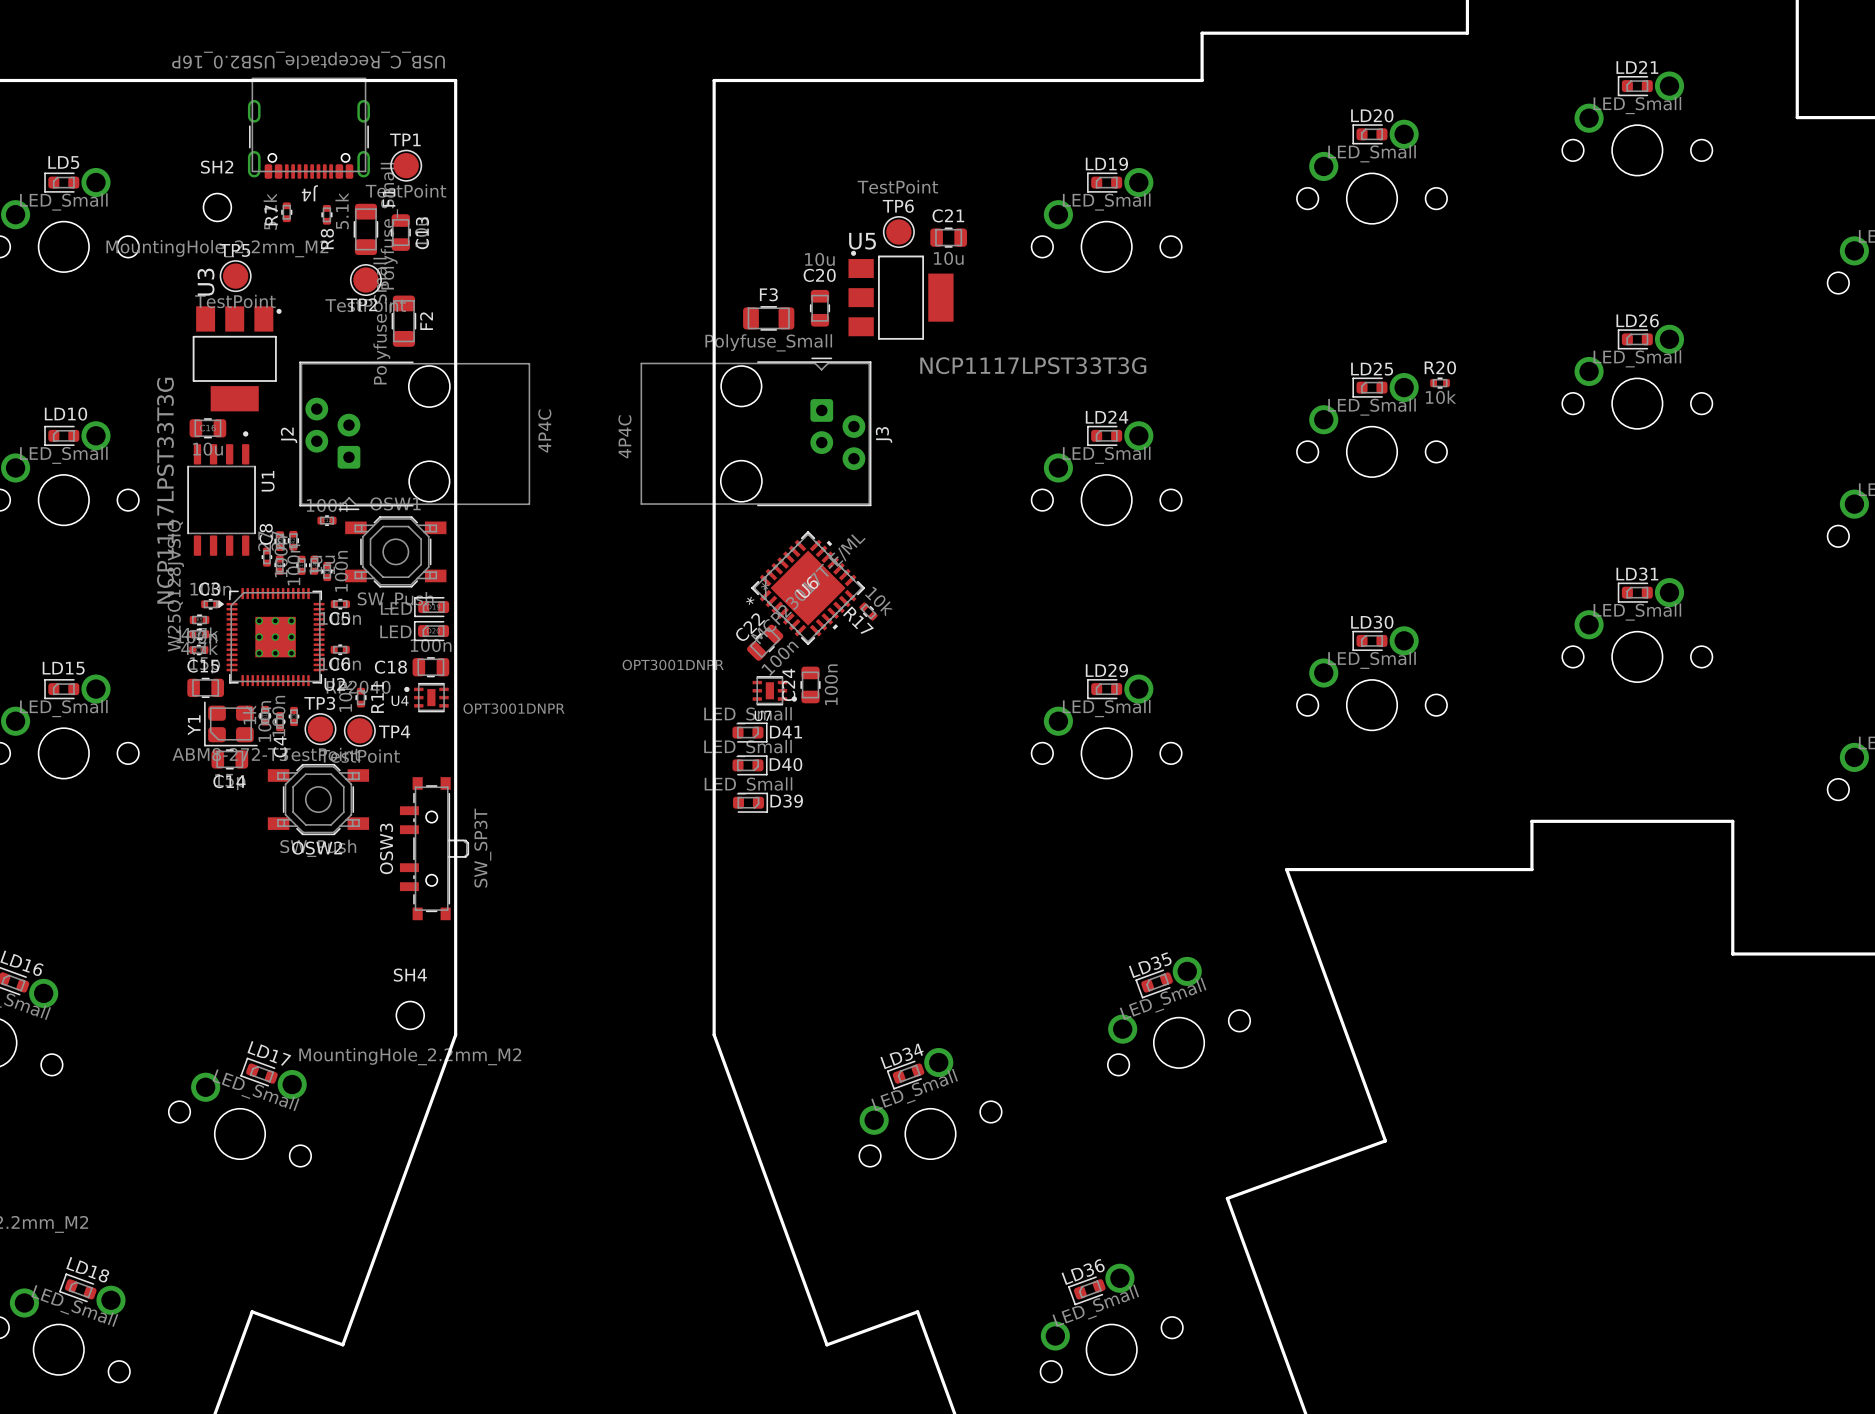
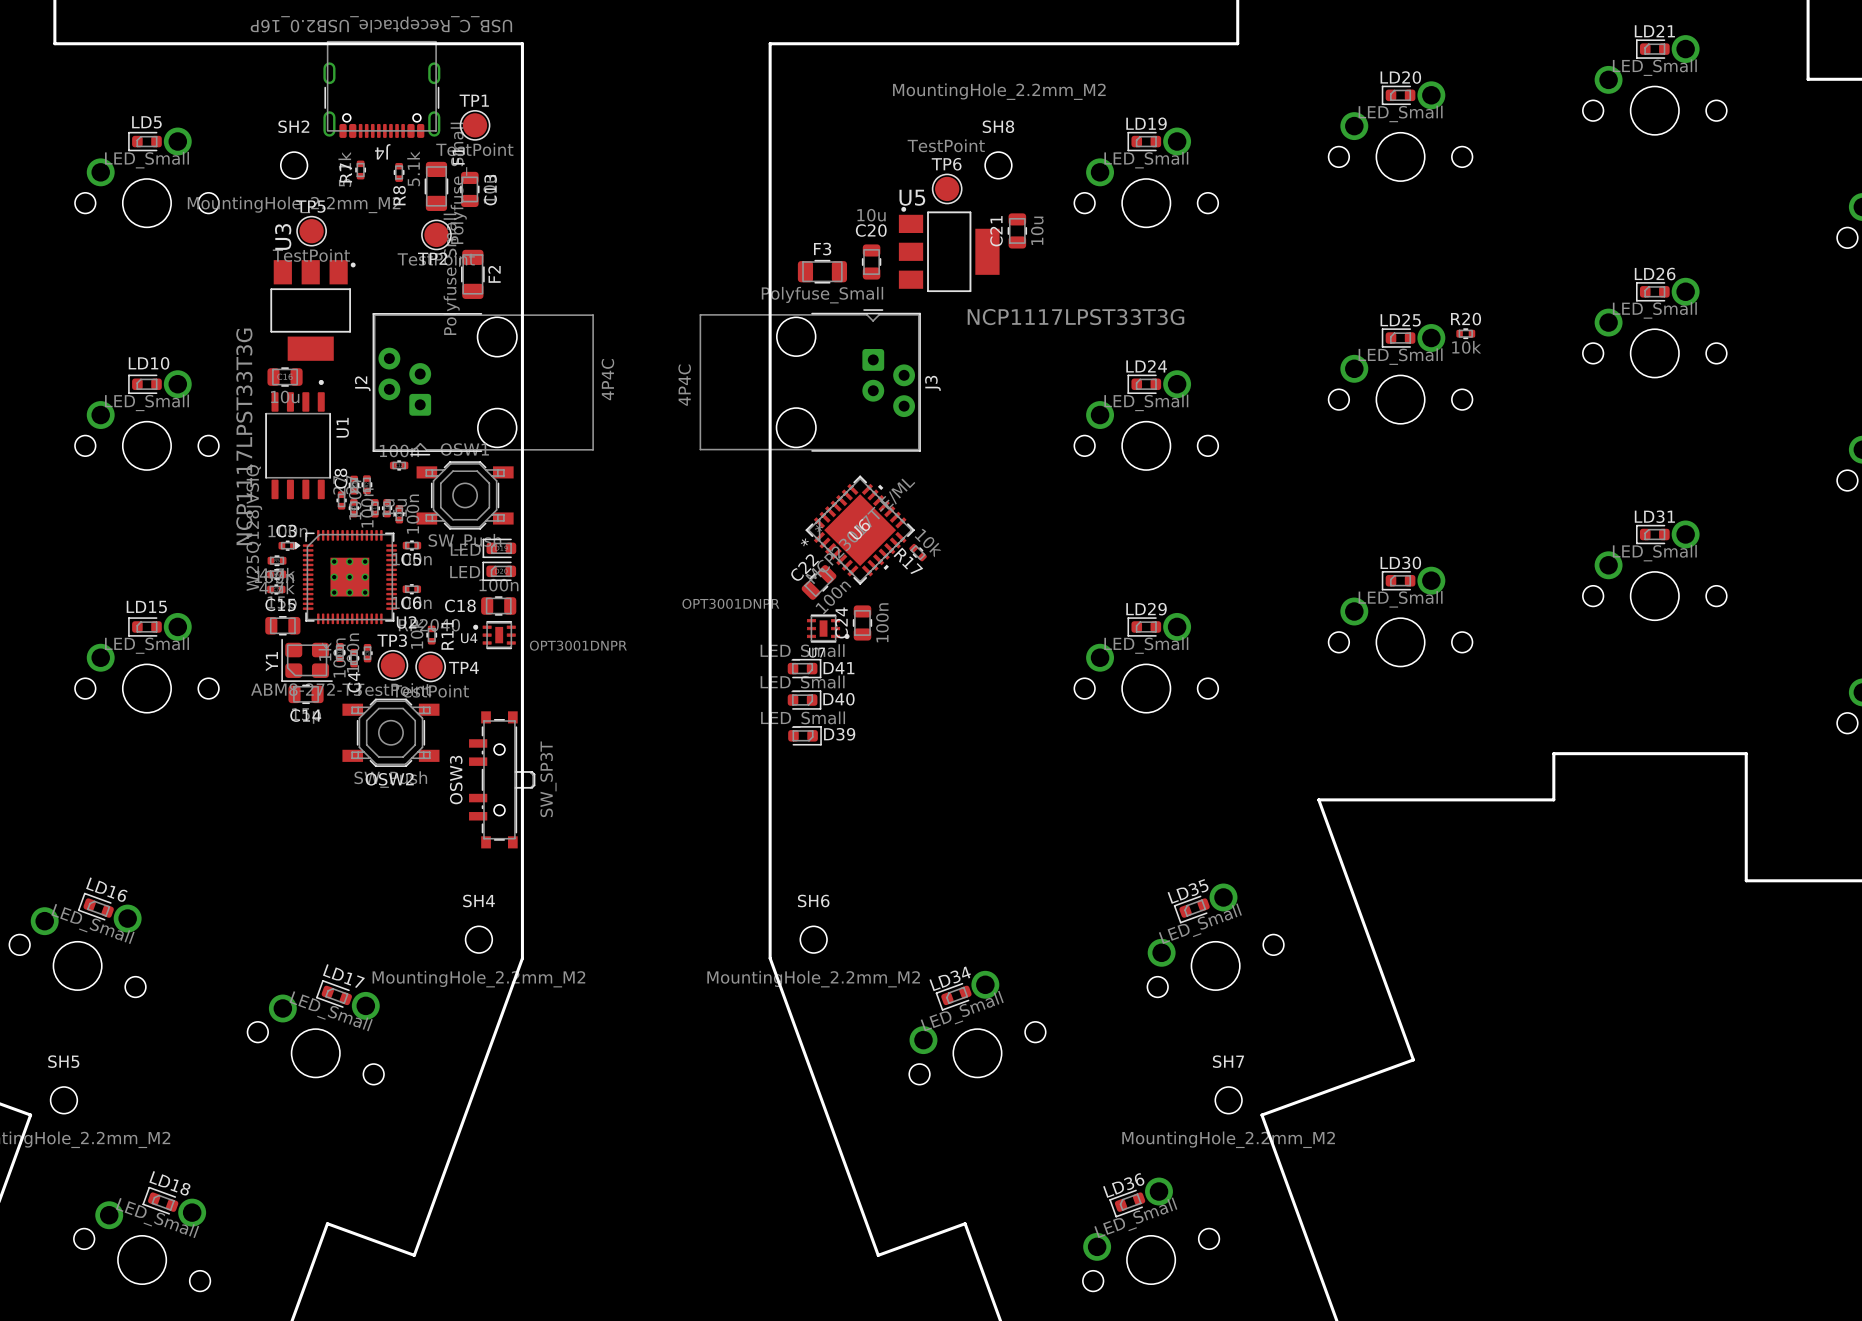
SH8: none -> MountingHole_2.2mm_M2 (998, 165)
C21 name position: C21 (948, 215) -> C21 (996, 231)
C21 rotation: 0° (948, 237) -> 90° clockwise (1017, 230)
C21 position: (948, 237) -> (1017, 230)
C21 value position: 10u (948, 258) -> 10u (1037, 230)
SH6: none -> MountingHole_2.2mm_M2 (813, 939)
SH7: none -> MountingHole_2.2mm_M2 (1228, 1100)

